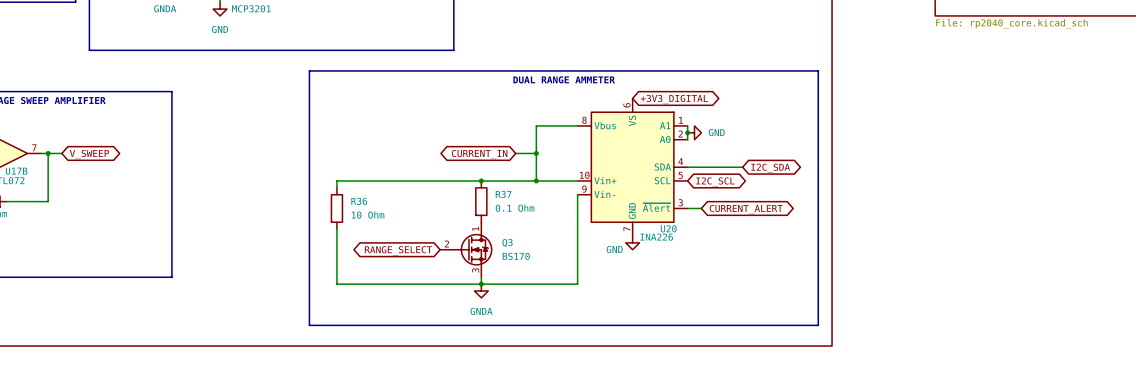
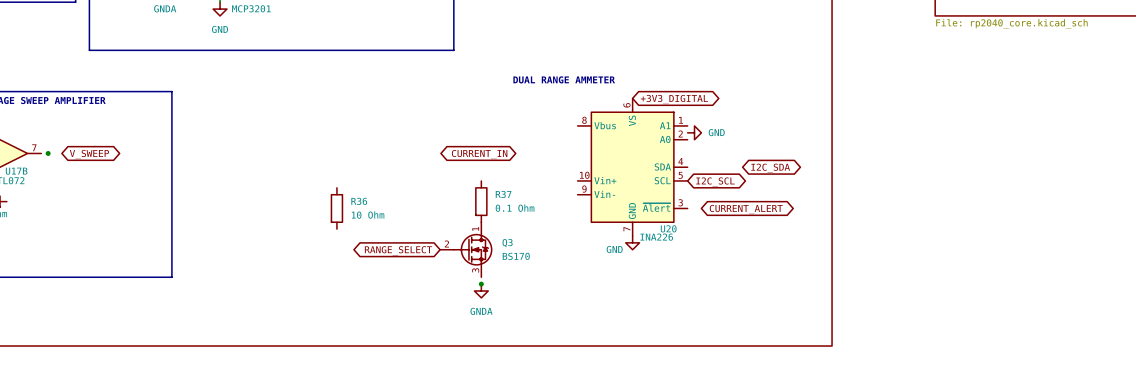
line: (309, 70) (818, 70) (818, 325) (309, 325) (309, 70) -> none
wire: (577, 125) (536, 125) (536, 180) -> none
wire: (687, 125) (687, 139) -> none
junction: (687, 132) -> none
wire: (41, 153) (61, 153) -> none
wire: (48, 153) (48, 201) (6, 201) -> none
wire: (515, 153) (536, 153) -> none
junction: (536, 153) -> none
wire: (687, 167) (742, 167) -> none
junction: (481, 180) -> none
junction: (536, 180) -> none
wire: (577, 180) (336, 180) (336, 187) -> none
wire: (577, 194) (577, 284) (336, 284) (336, 229) -> none
wire: (687, 208) (701, 208) -> none
wire: (481, 277) (481, 284) -> none

